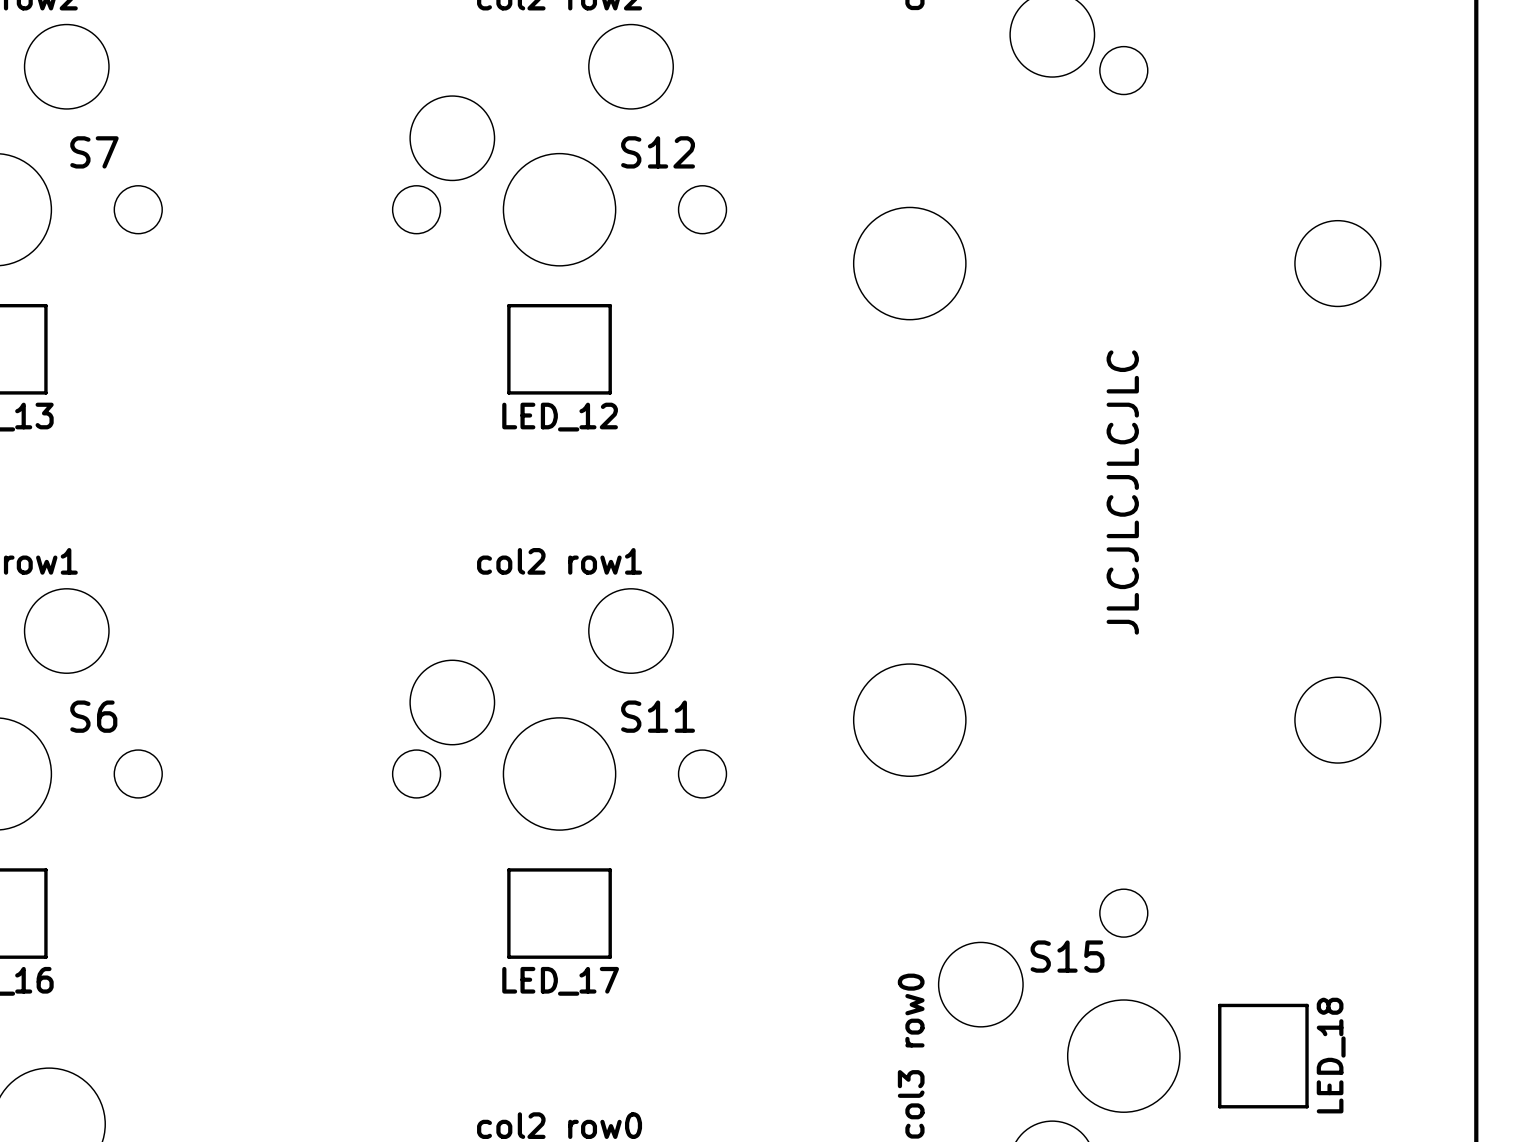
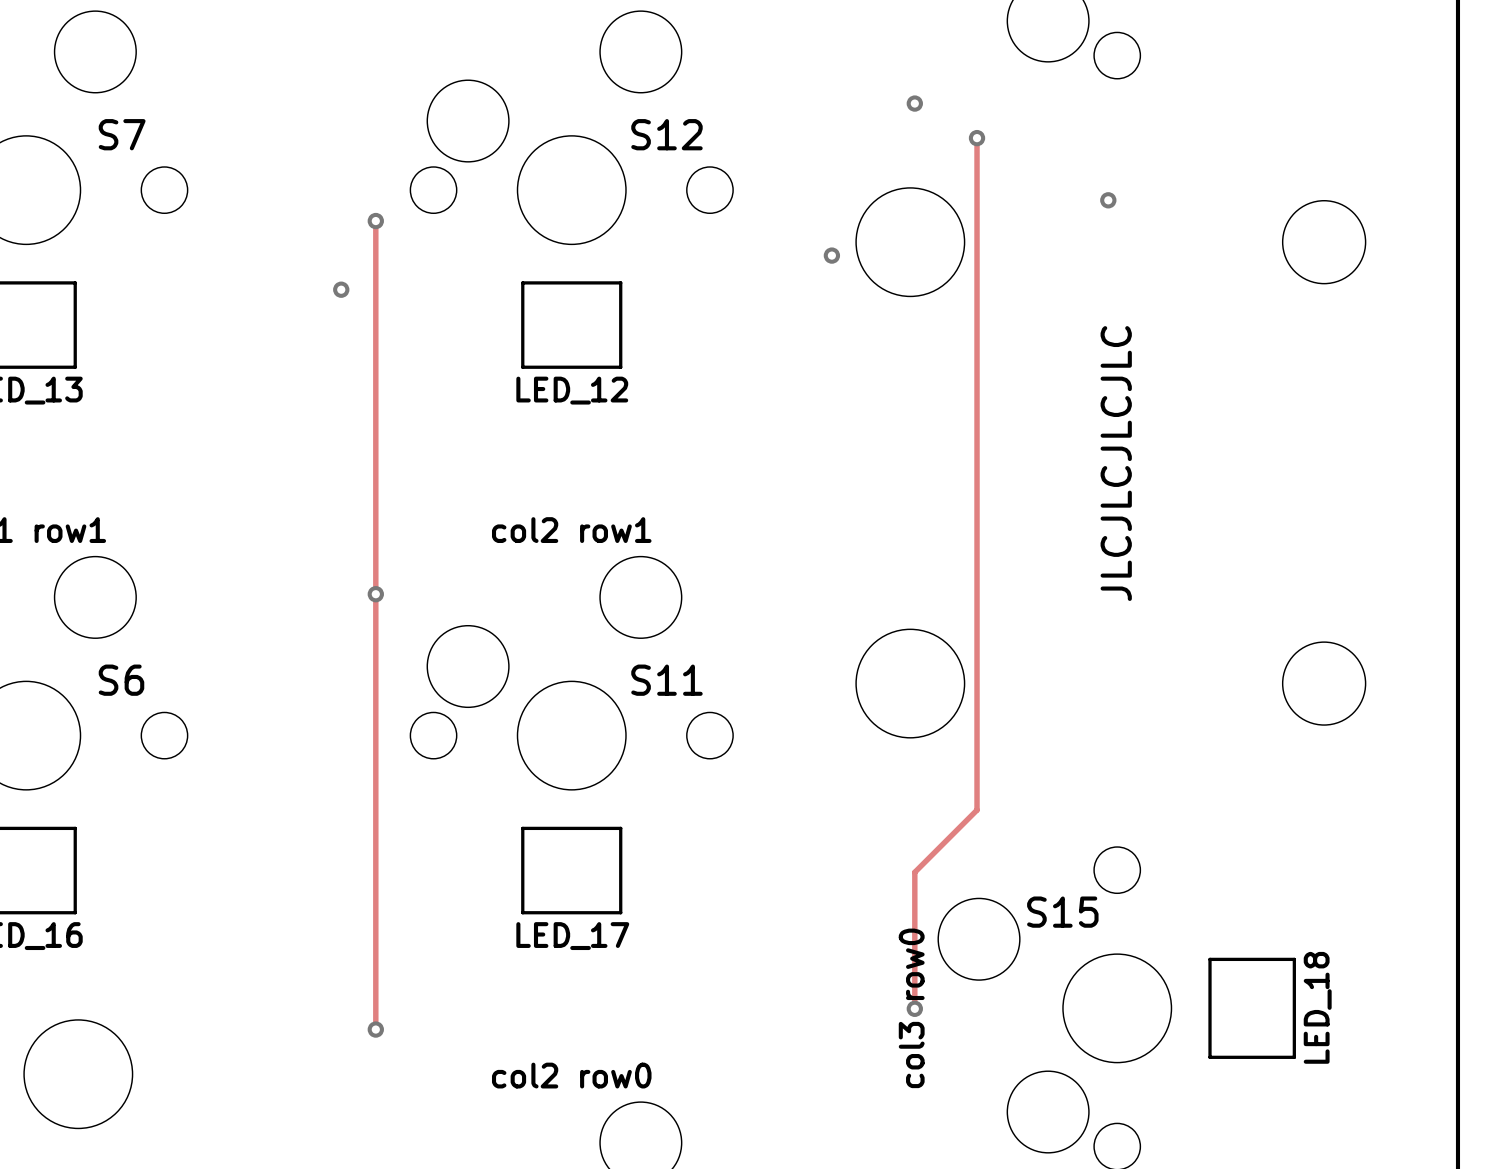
via: none -> (914, 103)
track: none -> (977, 138) (977, 810) (914, 872) (914, 1008)
via: none -> (977, 138)
via: none -> (1108, 200)
track: none -> (375, 221) (375, 1029)
via: none -> (375, 221)
via: none -> (831, 255)
via: none -> (341, 289)
via: none -> (375, 594)
via: none -> (914, 1008)
via: none -> (375, 1029)

